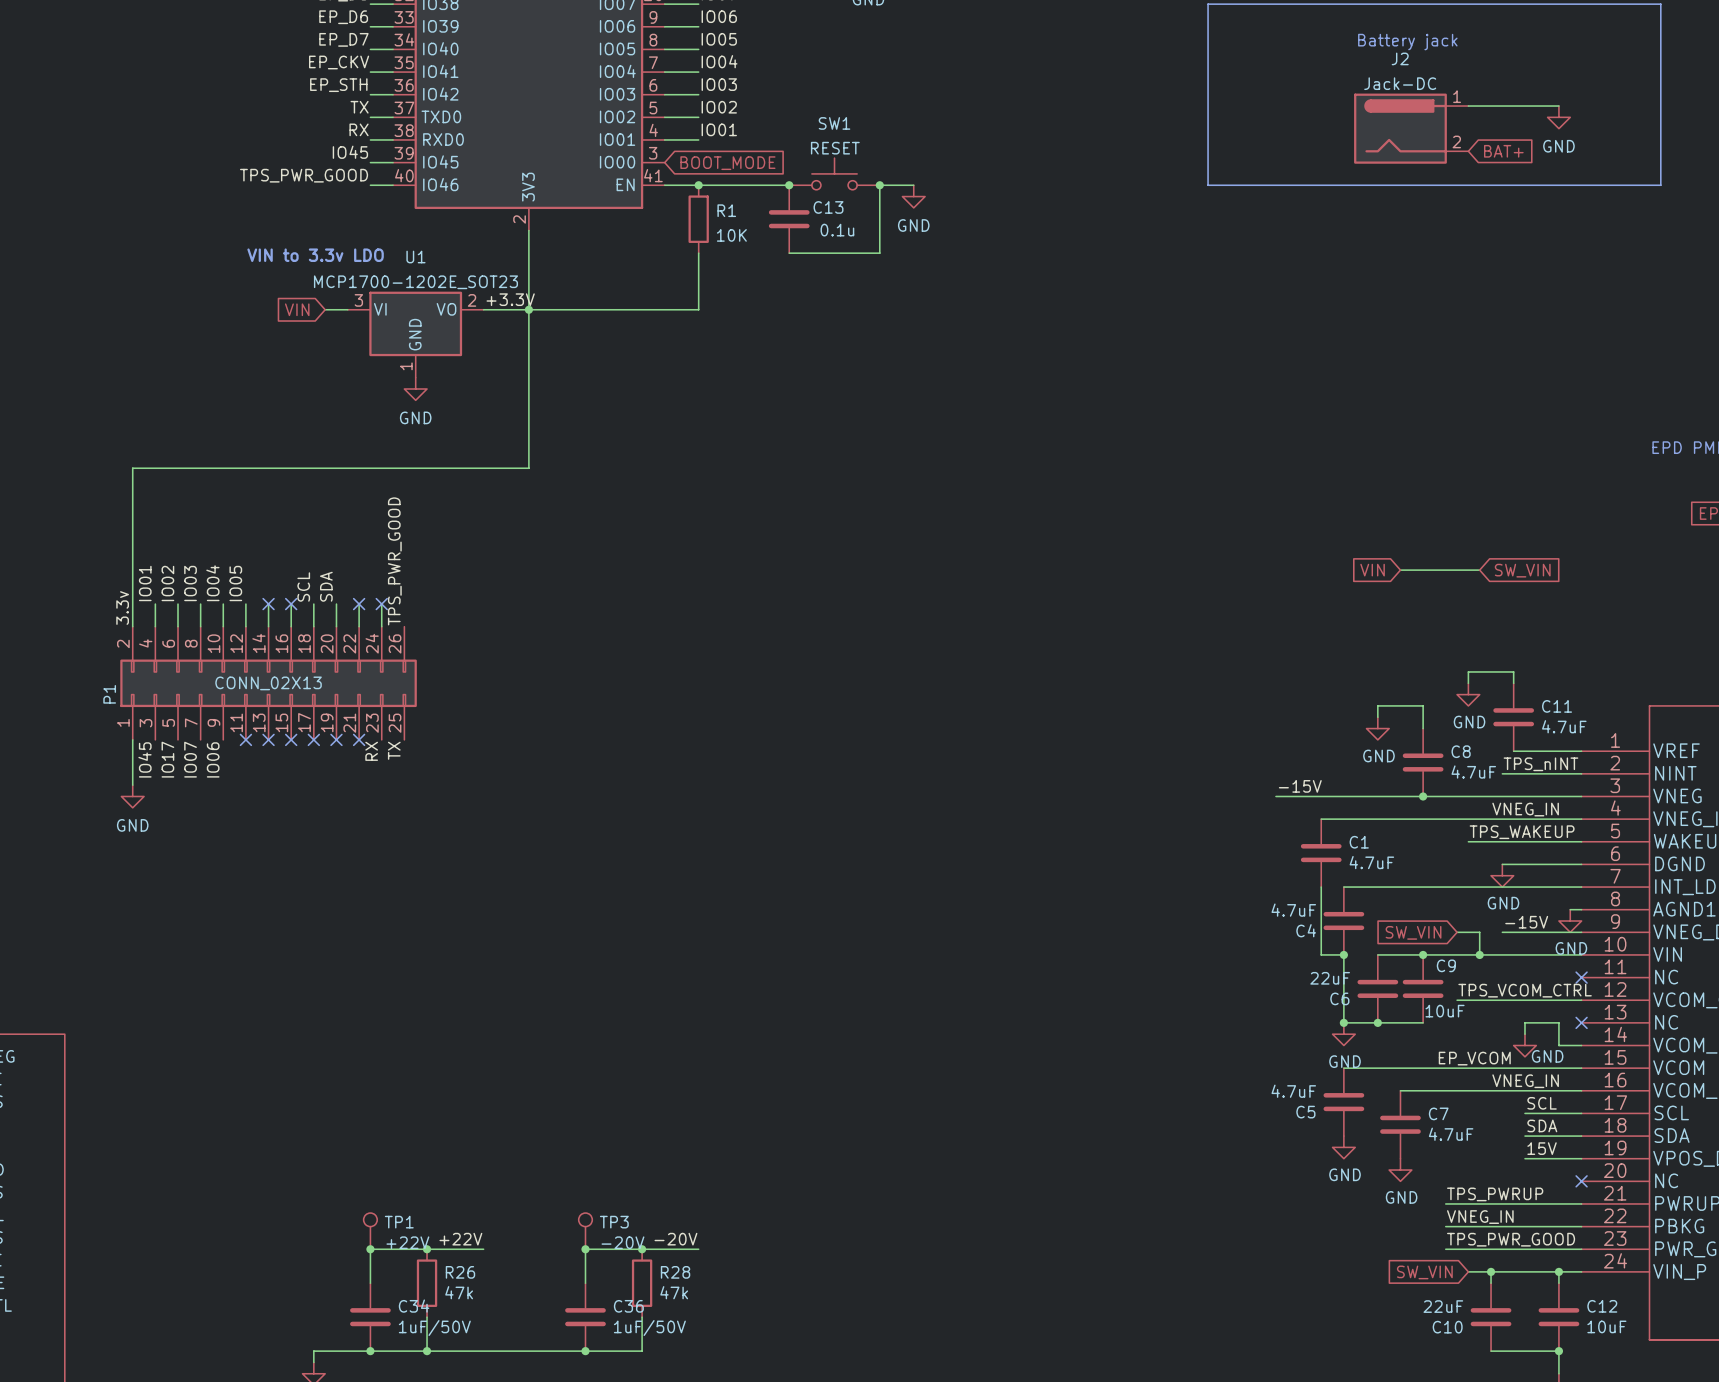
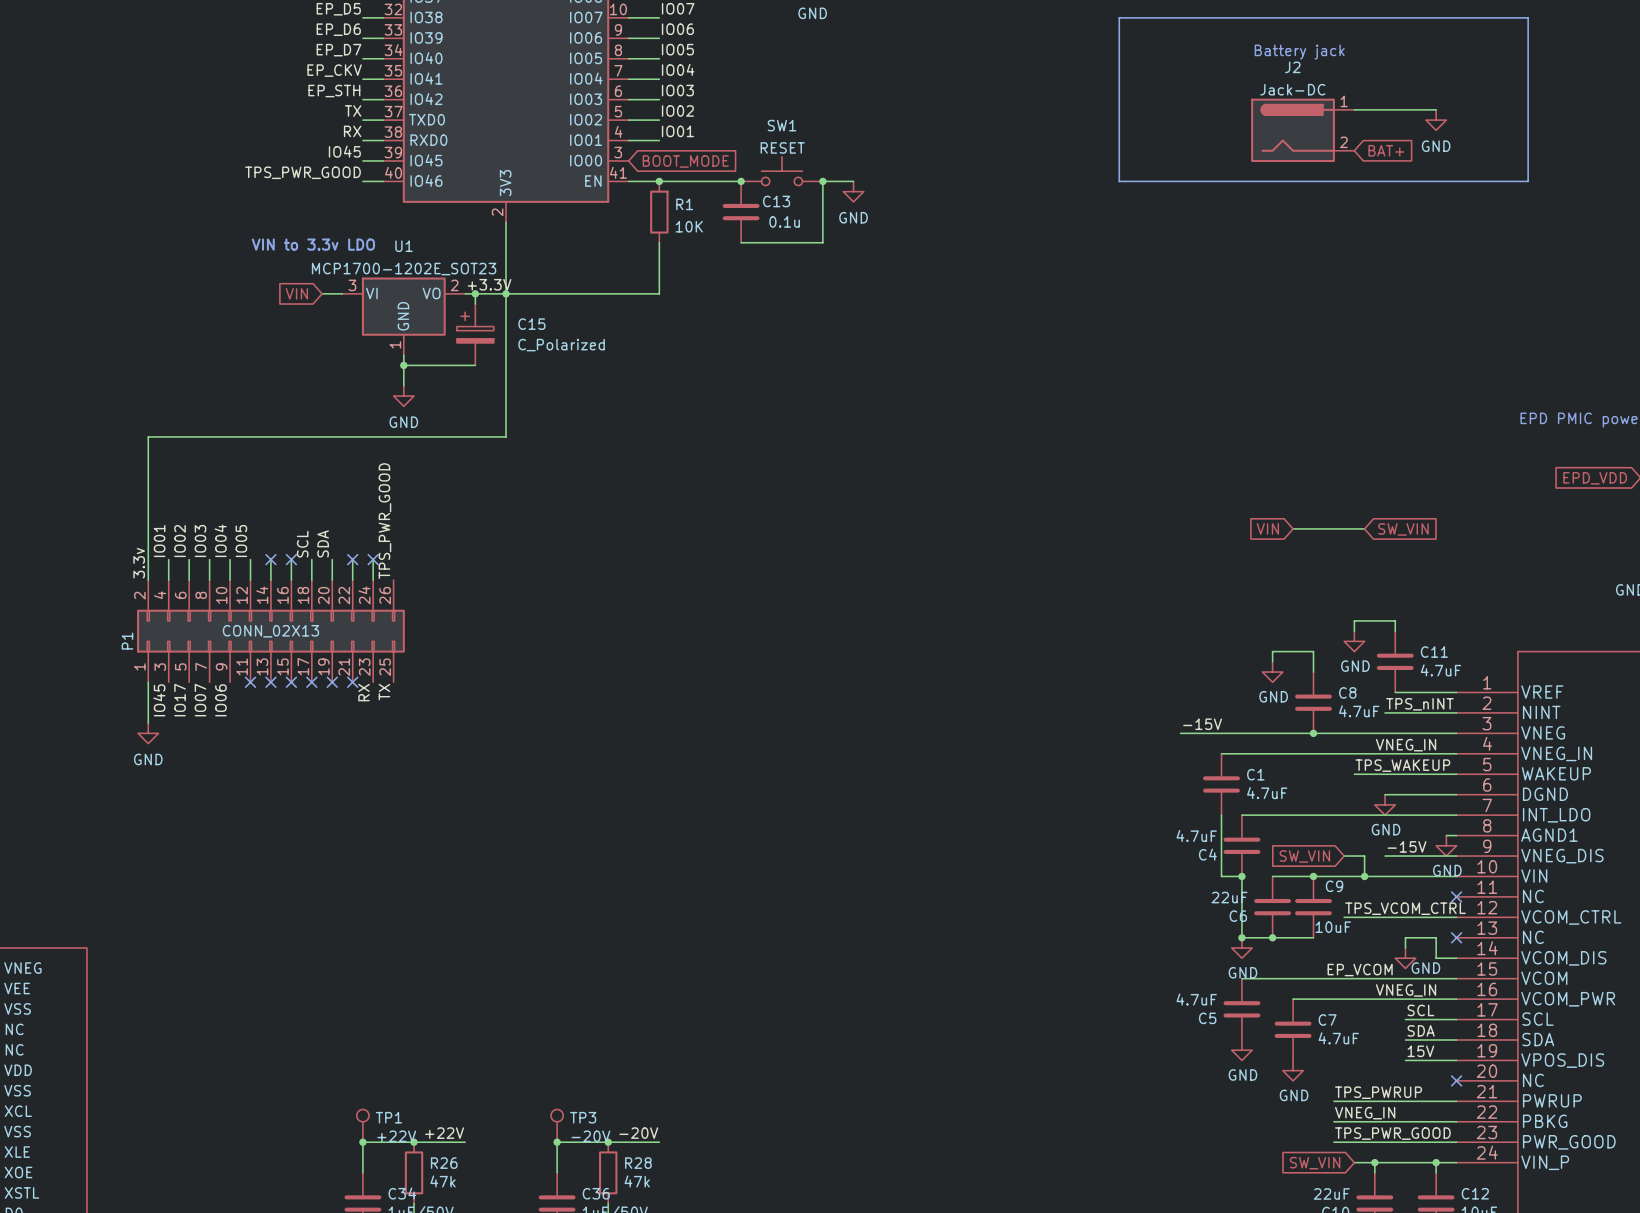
wire: none -> (475, 293) (475, 304)
junction: none -> (475, 293)
C15: none -> C_Polarized (475, 334)
wire: none -> (403, 355) (403, 385)
wire: none -> (403, 365) (475, 365)
power symbol position: GND (415, 389) -> GND (403, 396)
junction: none -> (403, 365)

